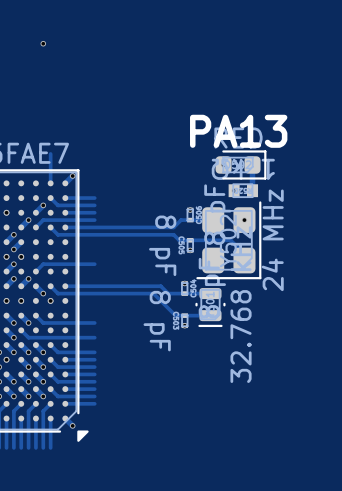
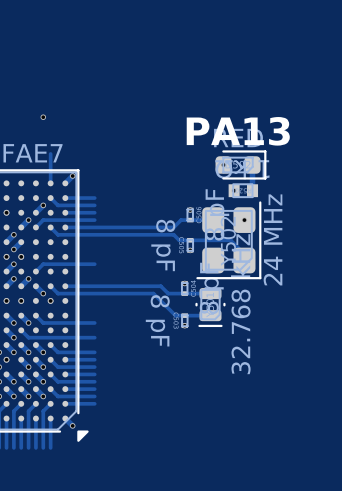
via position: (43, 43) -> (43, 117)

